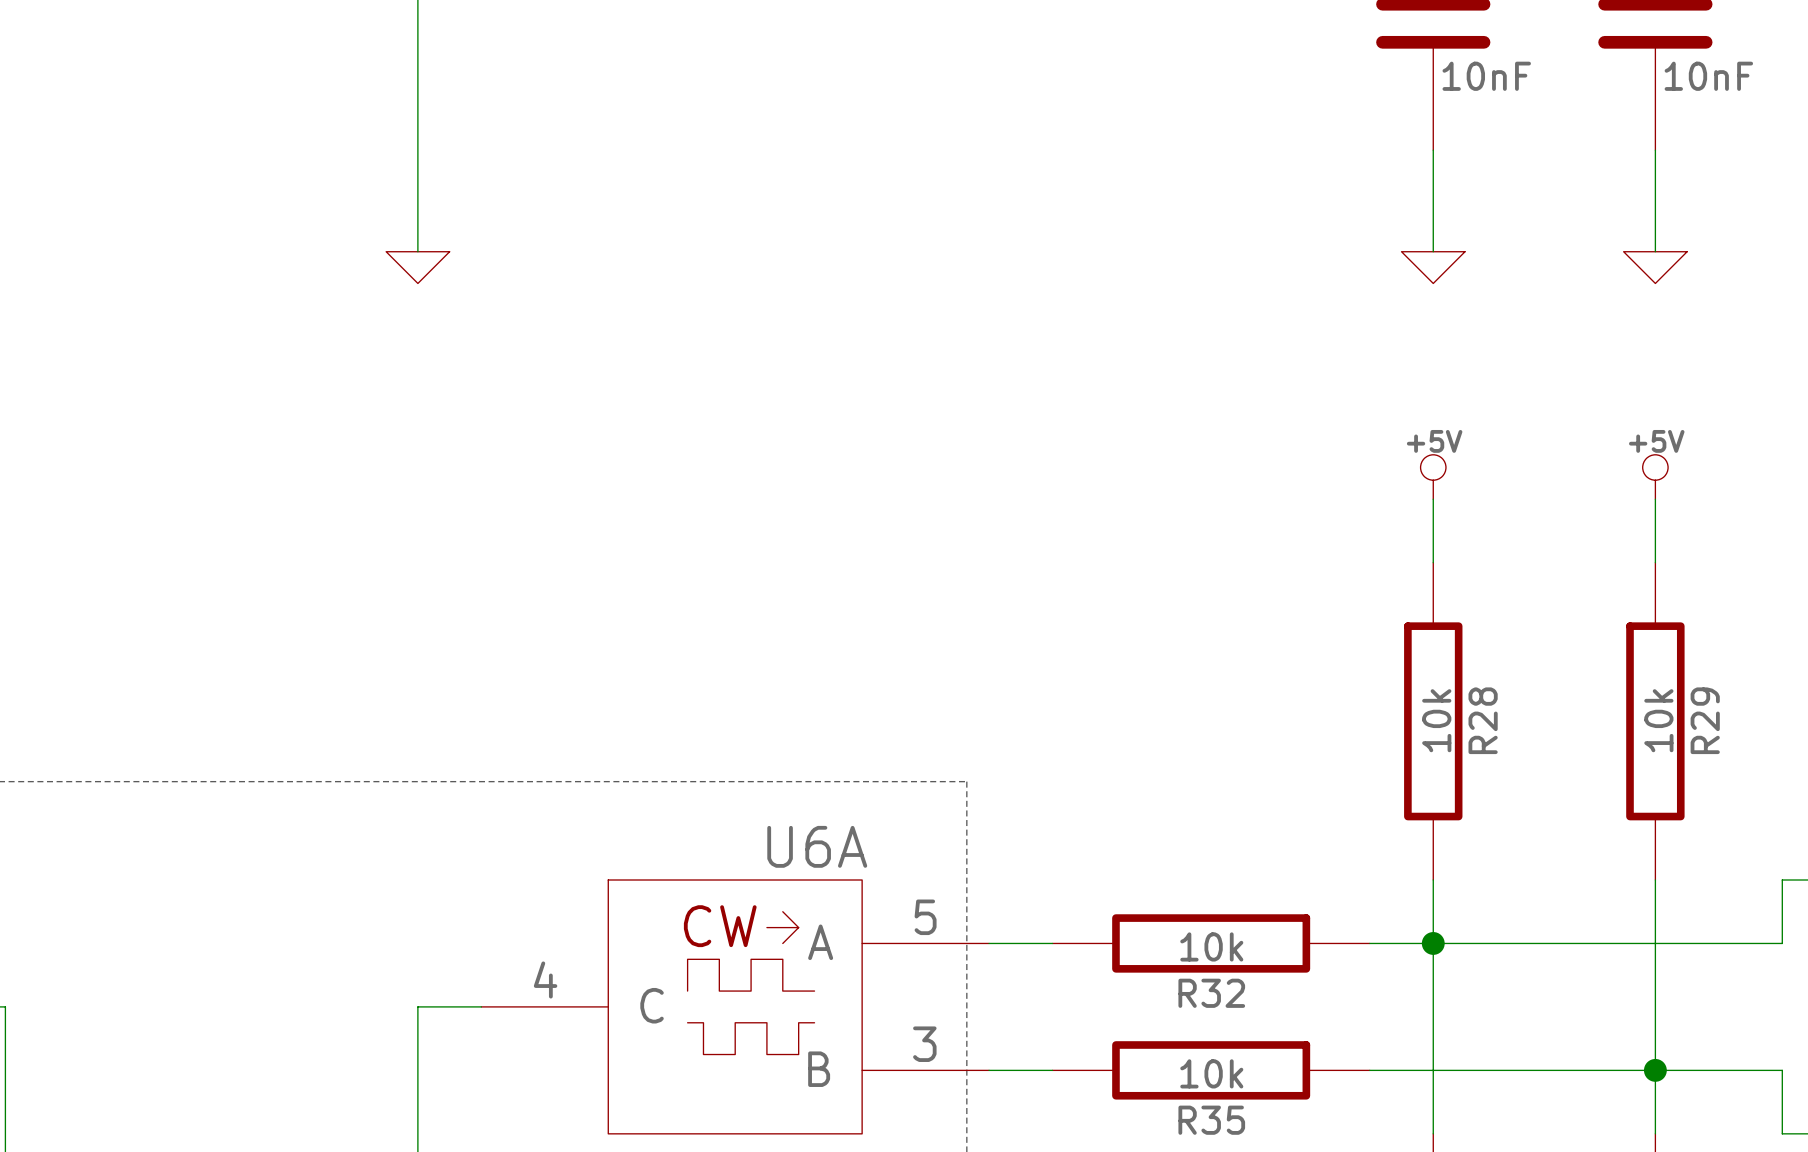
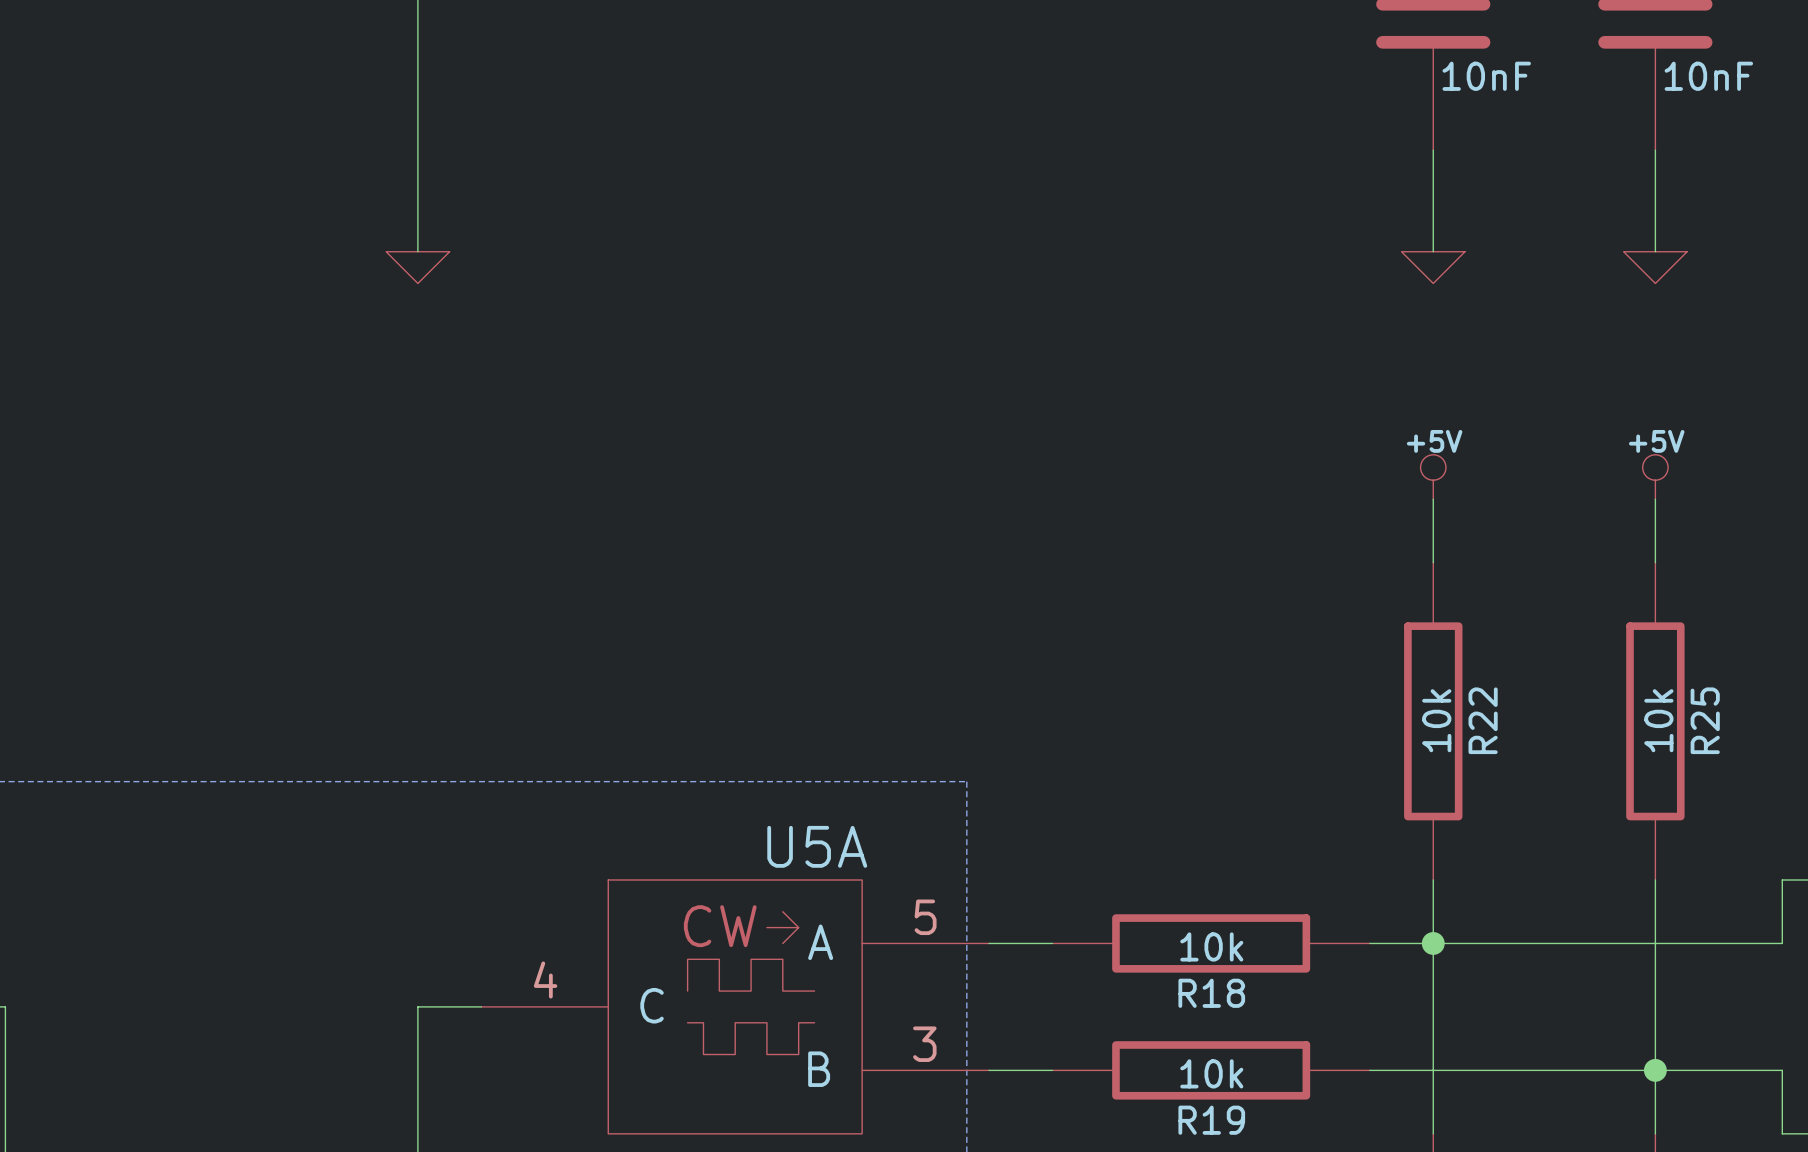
R28 name: R28 (1483, 720) -> R22 (1483, 720)
R29 name: R29 (1705, 720) -> R25 (1705, 720)
U6A name: U6A (817, 846) -> U5A (817, 846)
R32 name: R32 (1211, 993) -> R18 (1211, 993)
R35 name: R35 (1211, 1120) -> R19 (1211, 1120)

